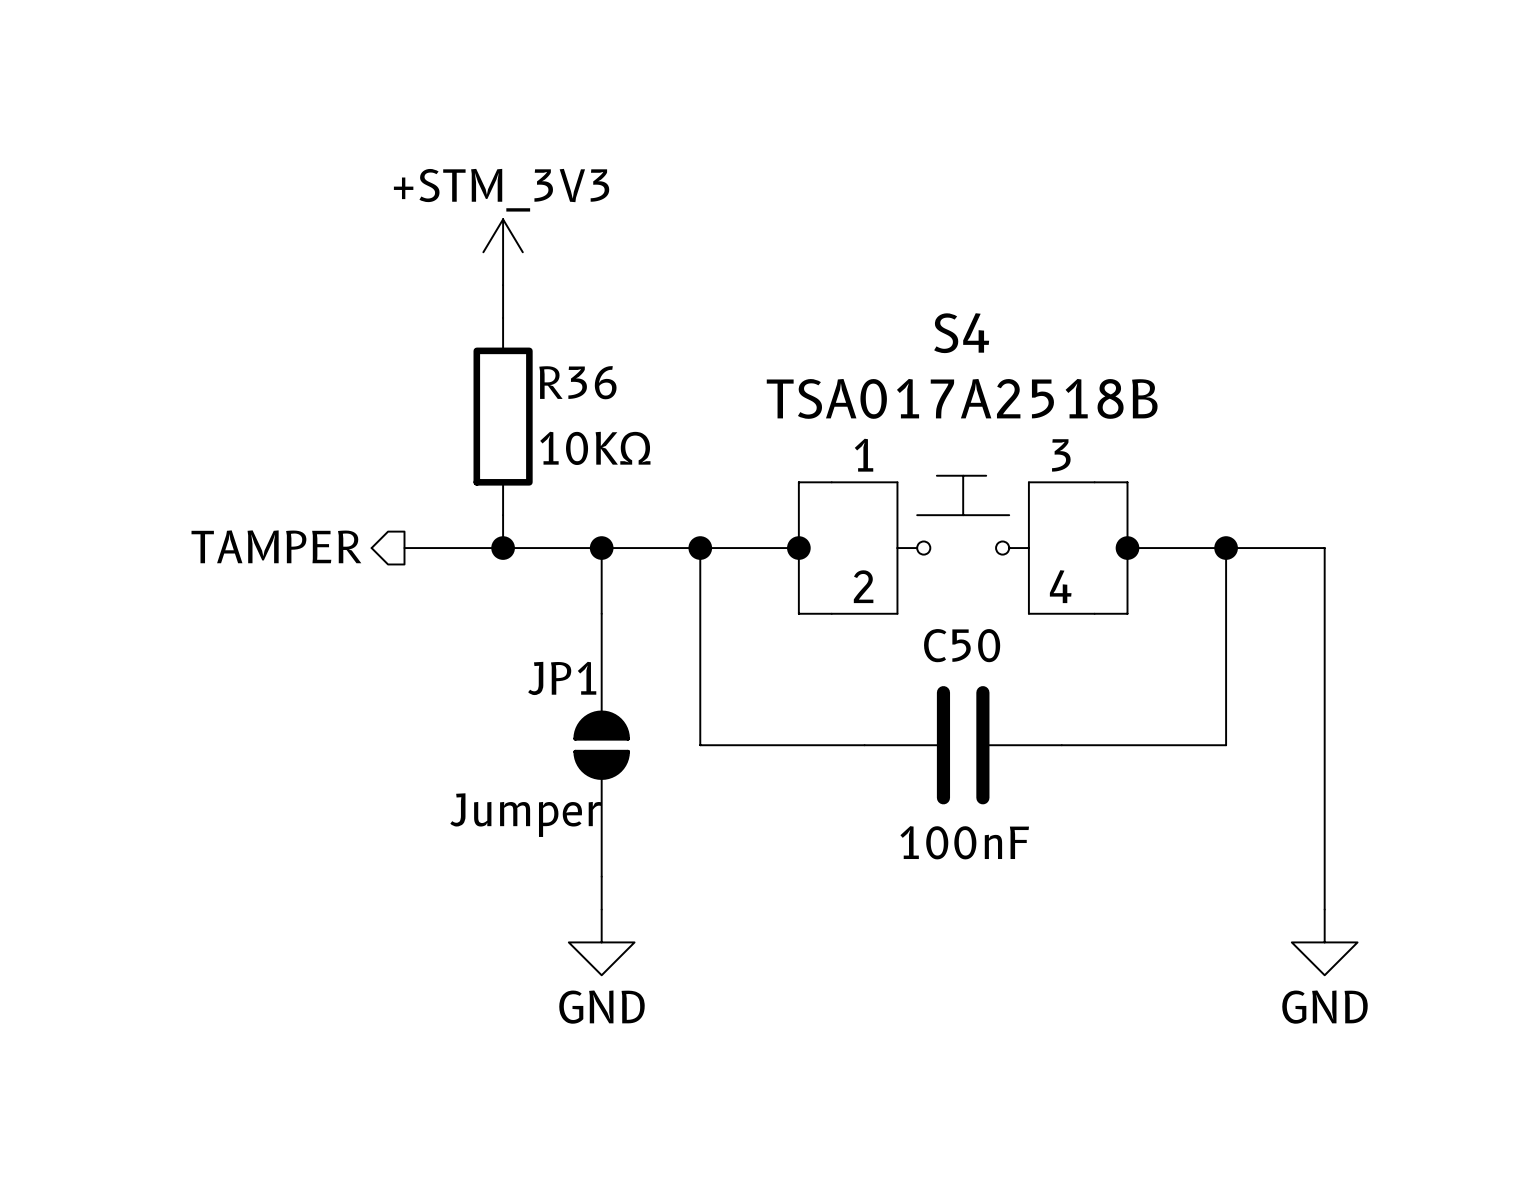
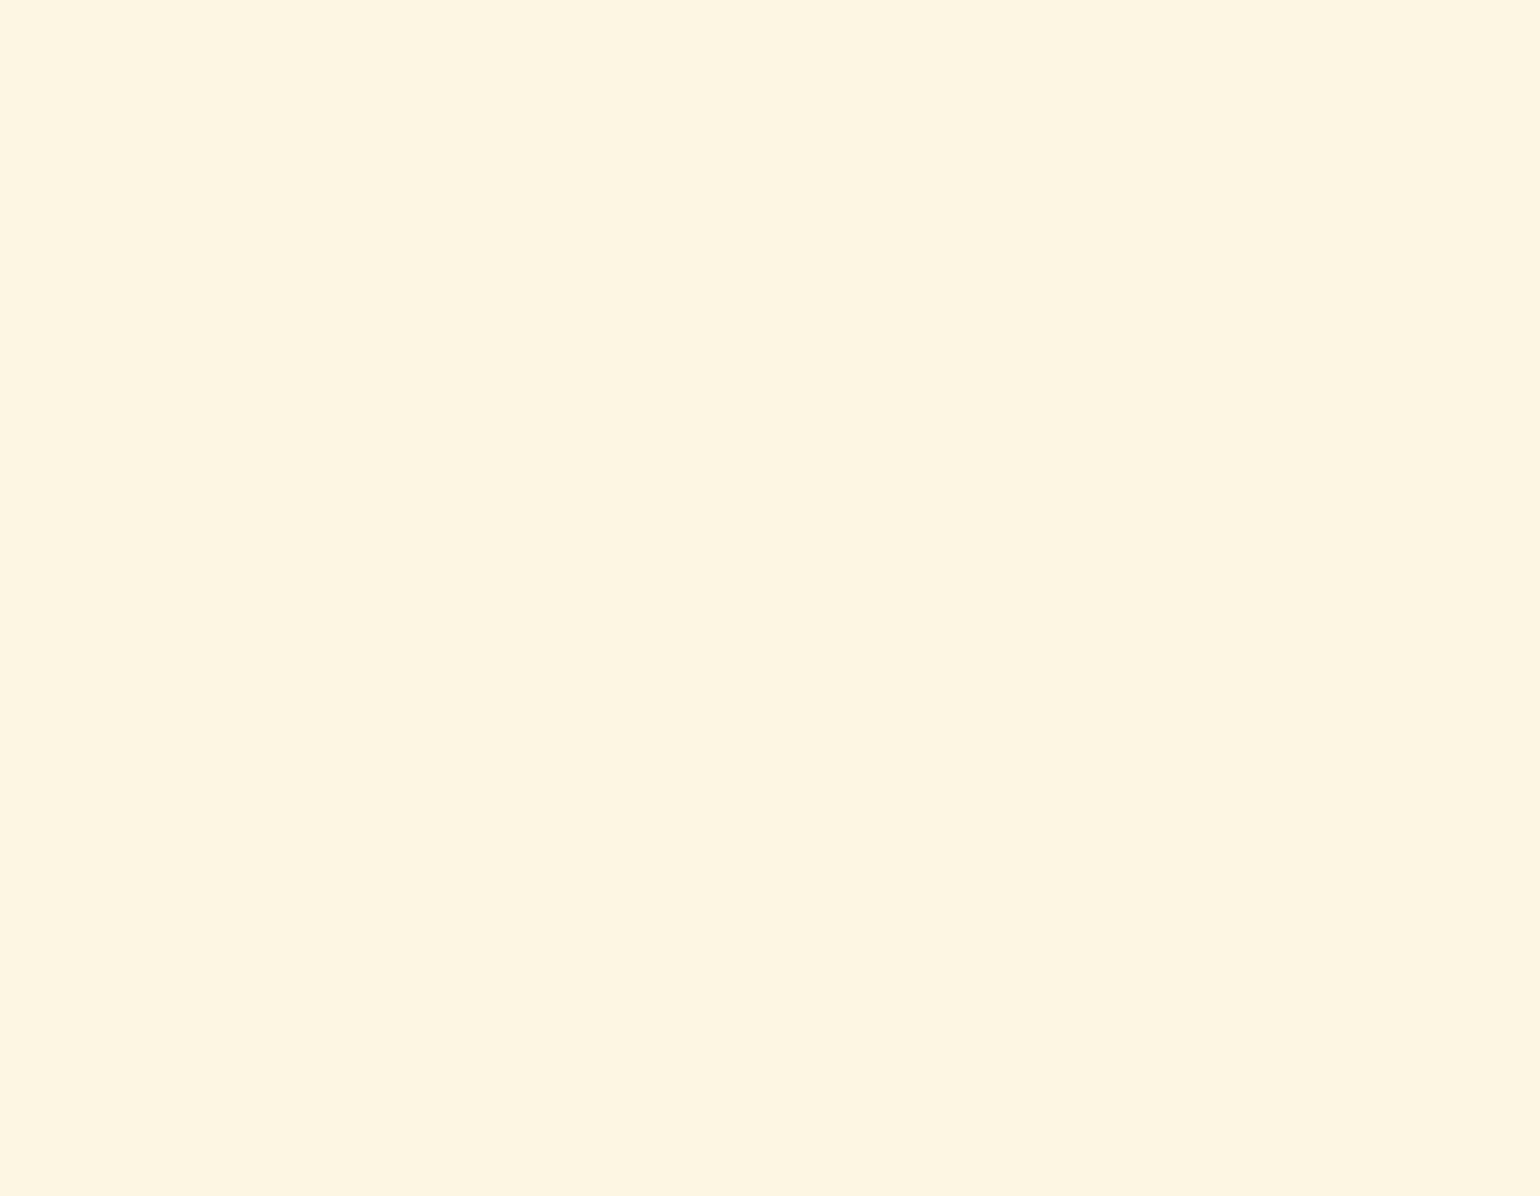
power symbol: +STM_3V3 (503, 252) -> none
wire: (503, 285) (503, 317) -> none
R36: 10KΩ (503, 416) -> none
wire: (831, 482) (798, 482) (798, 613) (831, 613) -> none
wire: (1094, 482) (1127, 482) (1127, 613) (1094, 613) -> none
wire: (503, 515) (503, 548) -> none
S4: TSA017A2518B (963, 544) -> none
hierarchical label: TAMPER (276, 546) -> none
wire: (404, 548) (798, 548) -> none
junction: (503, 548) -> none
wire: (601, 548) (601, 613) -> none
junction: (601, 548) -> none
wire: (700, 548) (700, 745) (864, 745) -> none
junction: (700, 548) -> none
junction: (798, 548) -> none
wire: (1127, 548) (1324, 548) (1324, 909) -> none
junction: (1127, 548) -> none
wire: (1226, 548) (1226, 745) (1061, 745) -> none
junction: (1226, 548) -> none
JP1: Jumper (601, 745) -> none
C50: 100nF (963, 745) -> none
wire: (601, 876) (601, 909) -> none
power symbol: GND (601, 942) -> none
power symbol: GND (1324, 942) -> none

